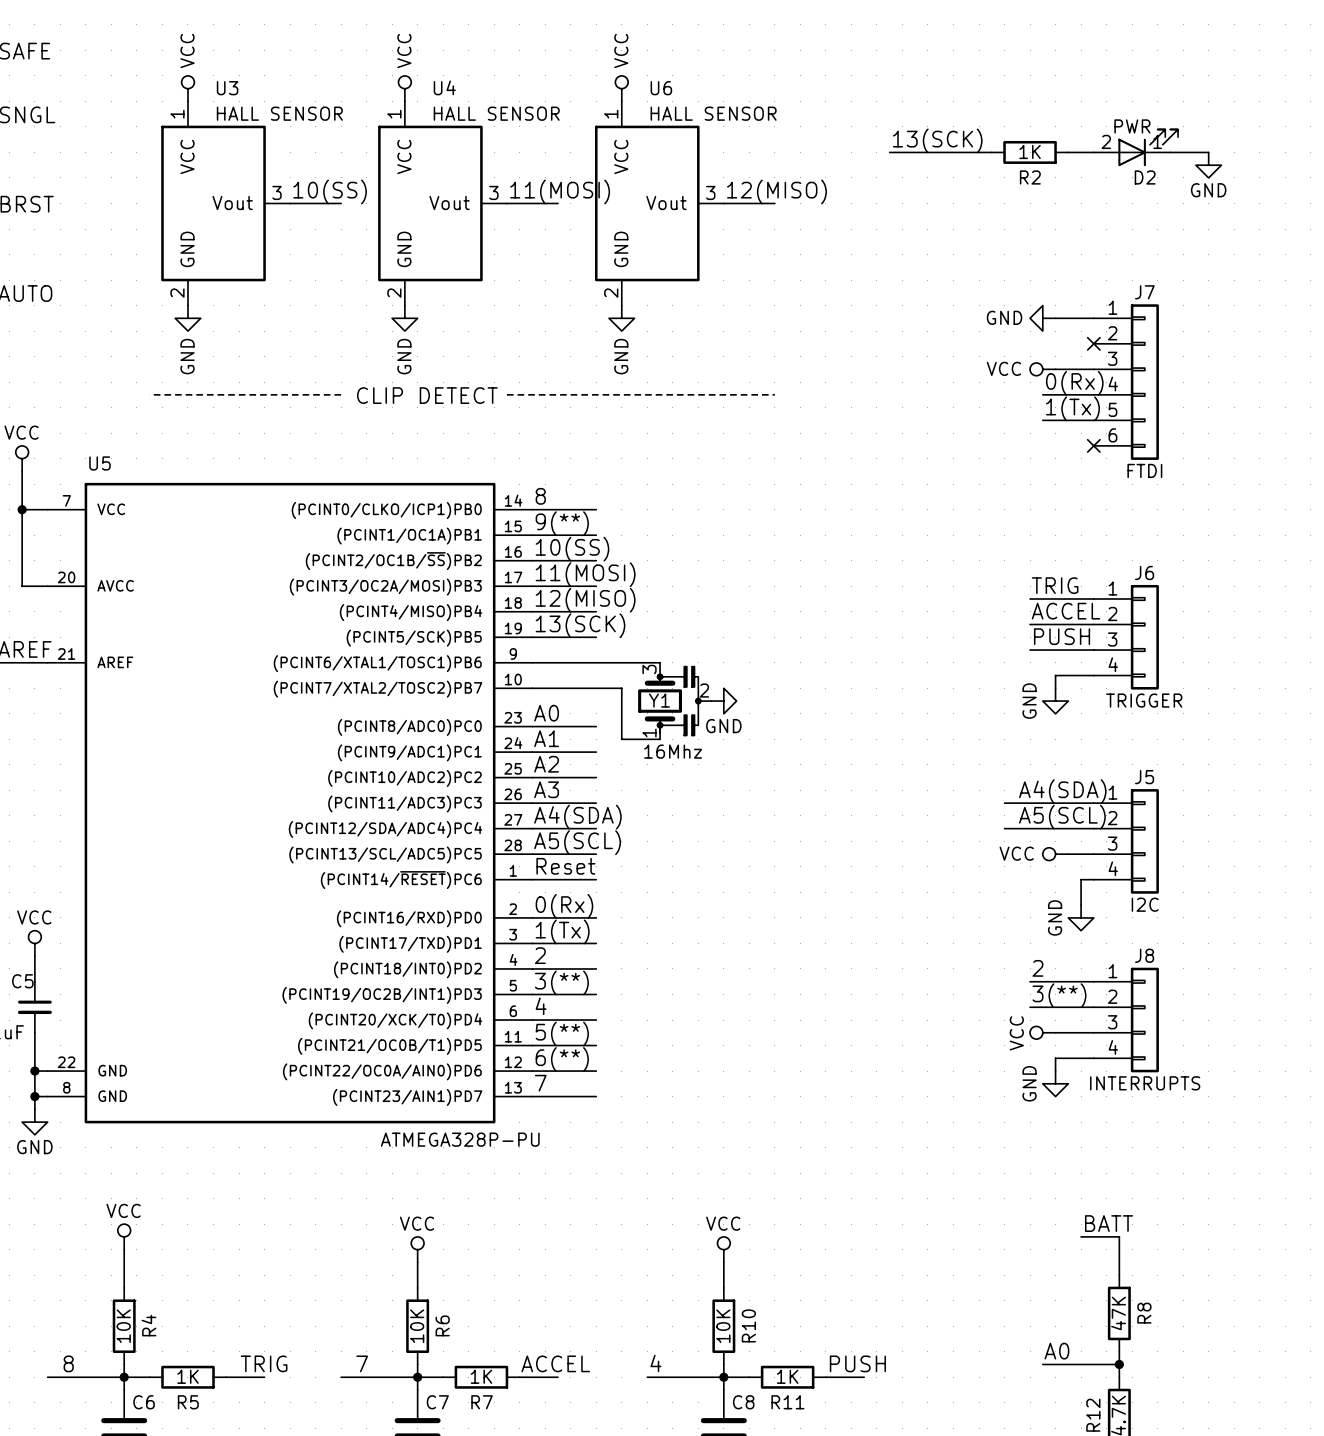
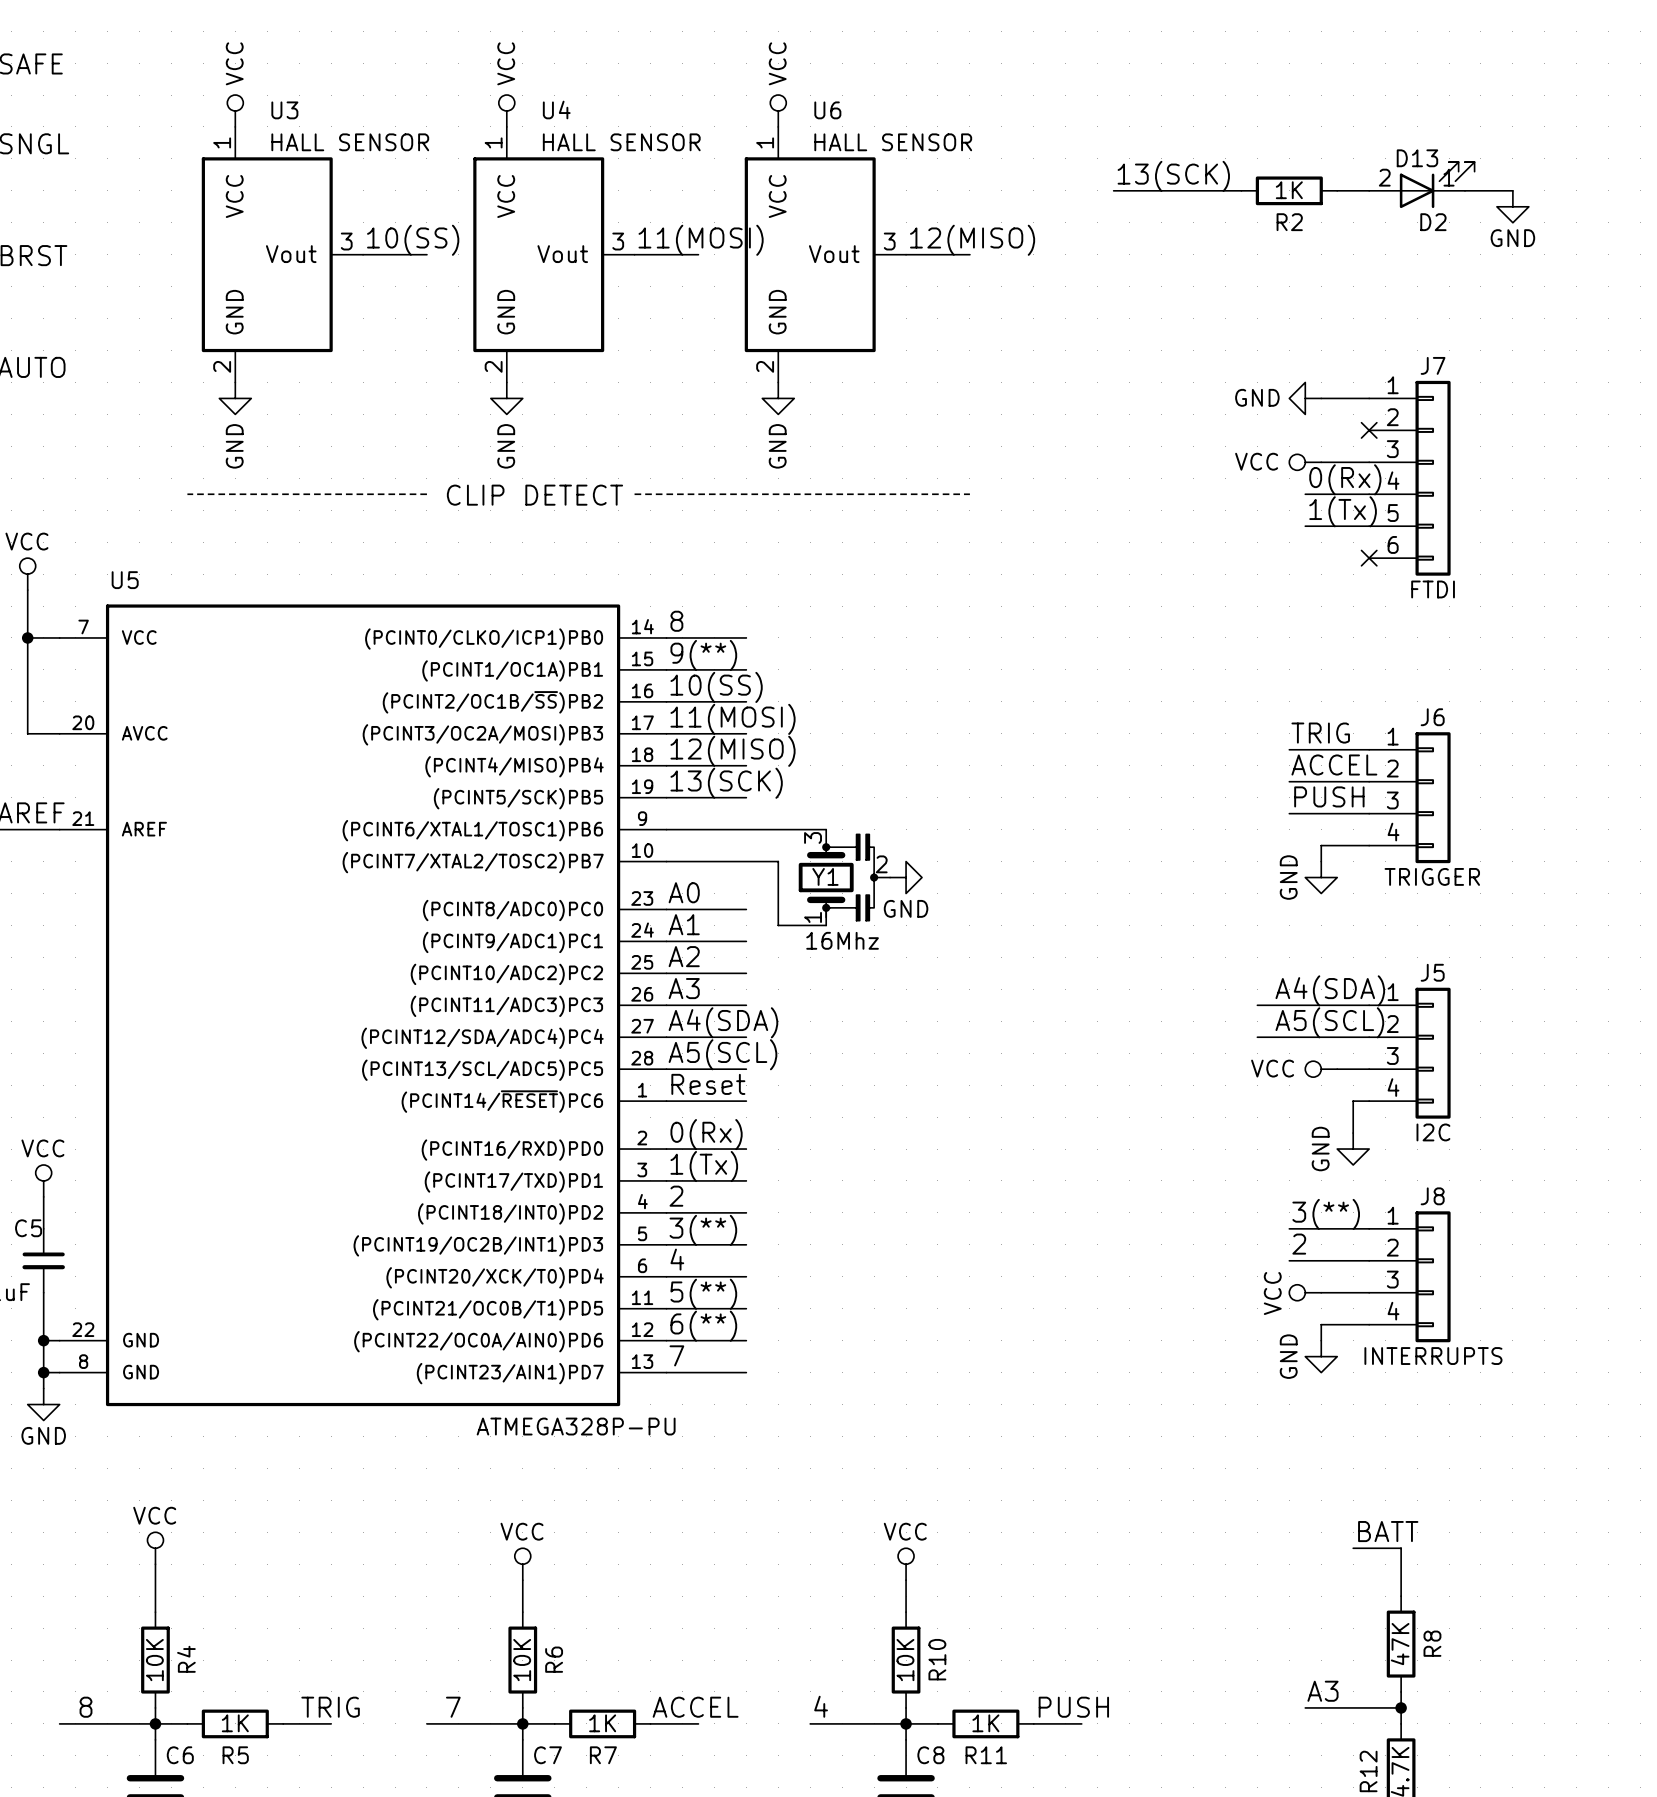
D2 value: PWR (1132, 126) -> D13 (1417, 158)
label: 2 (1037, 968) -> 3(**) (1326, 1214)
label: 3(**) (1059, 995) -> 2 (1299, 1244)
label: A0 (1056, 1351) -> A3 (1322, 1691)

